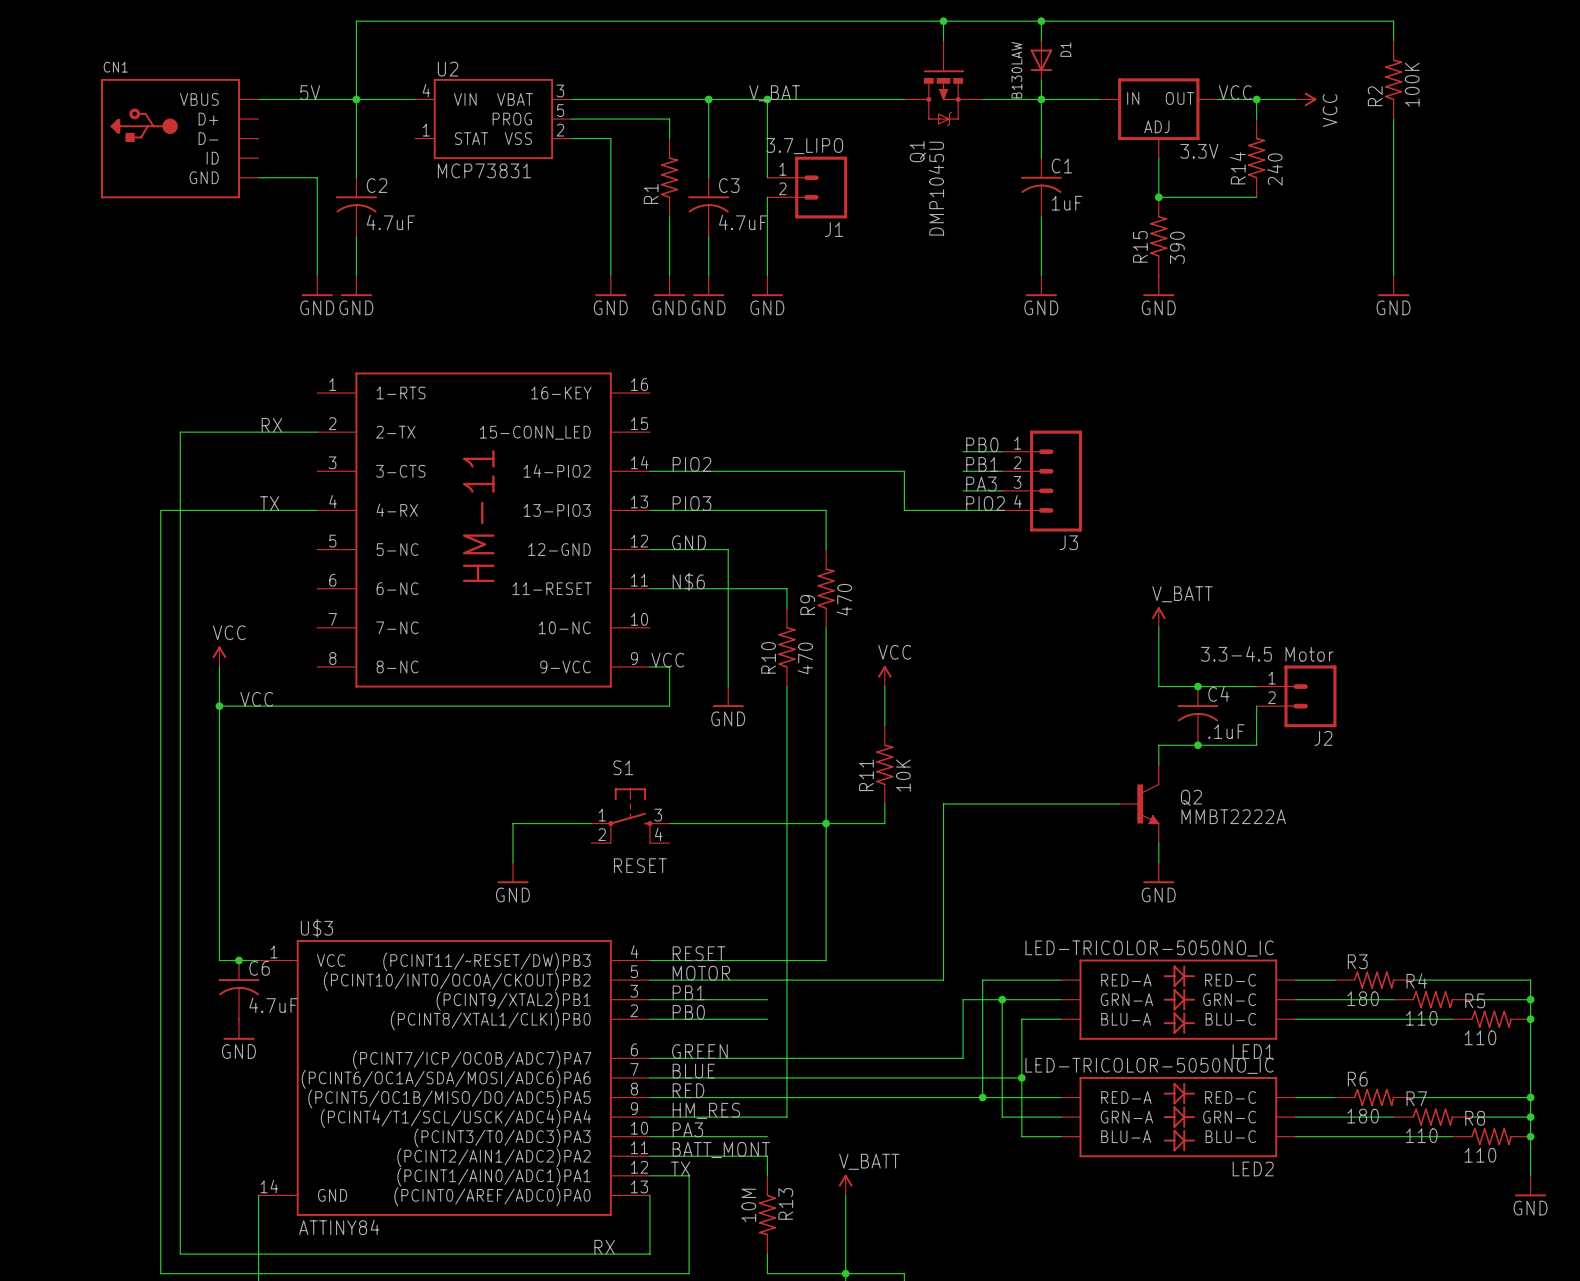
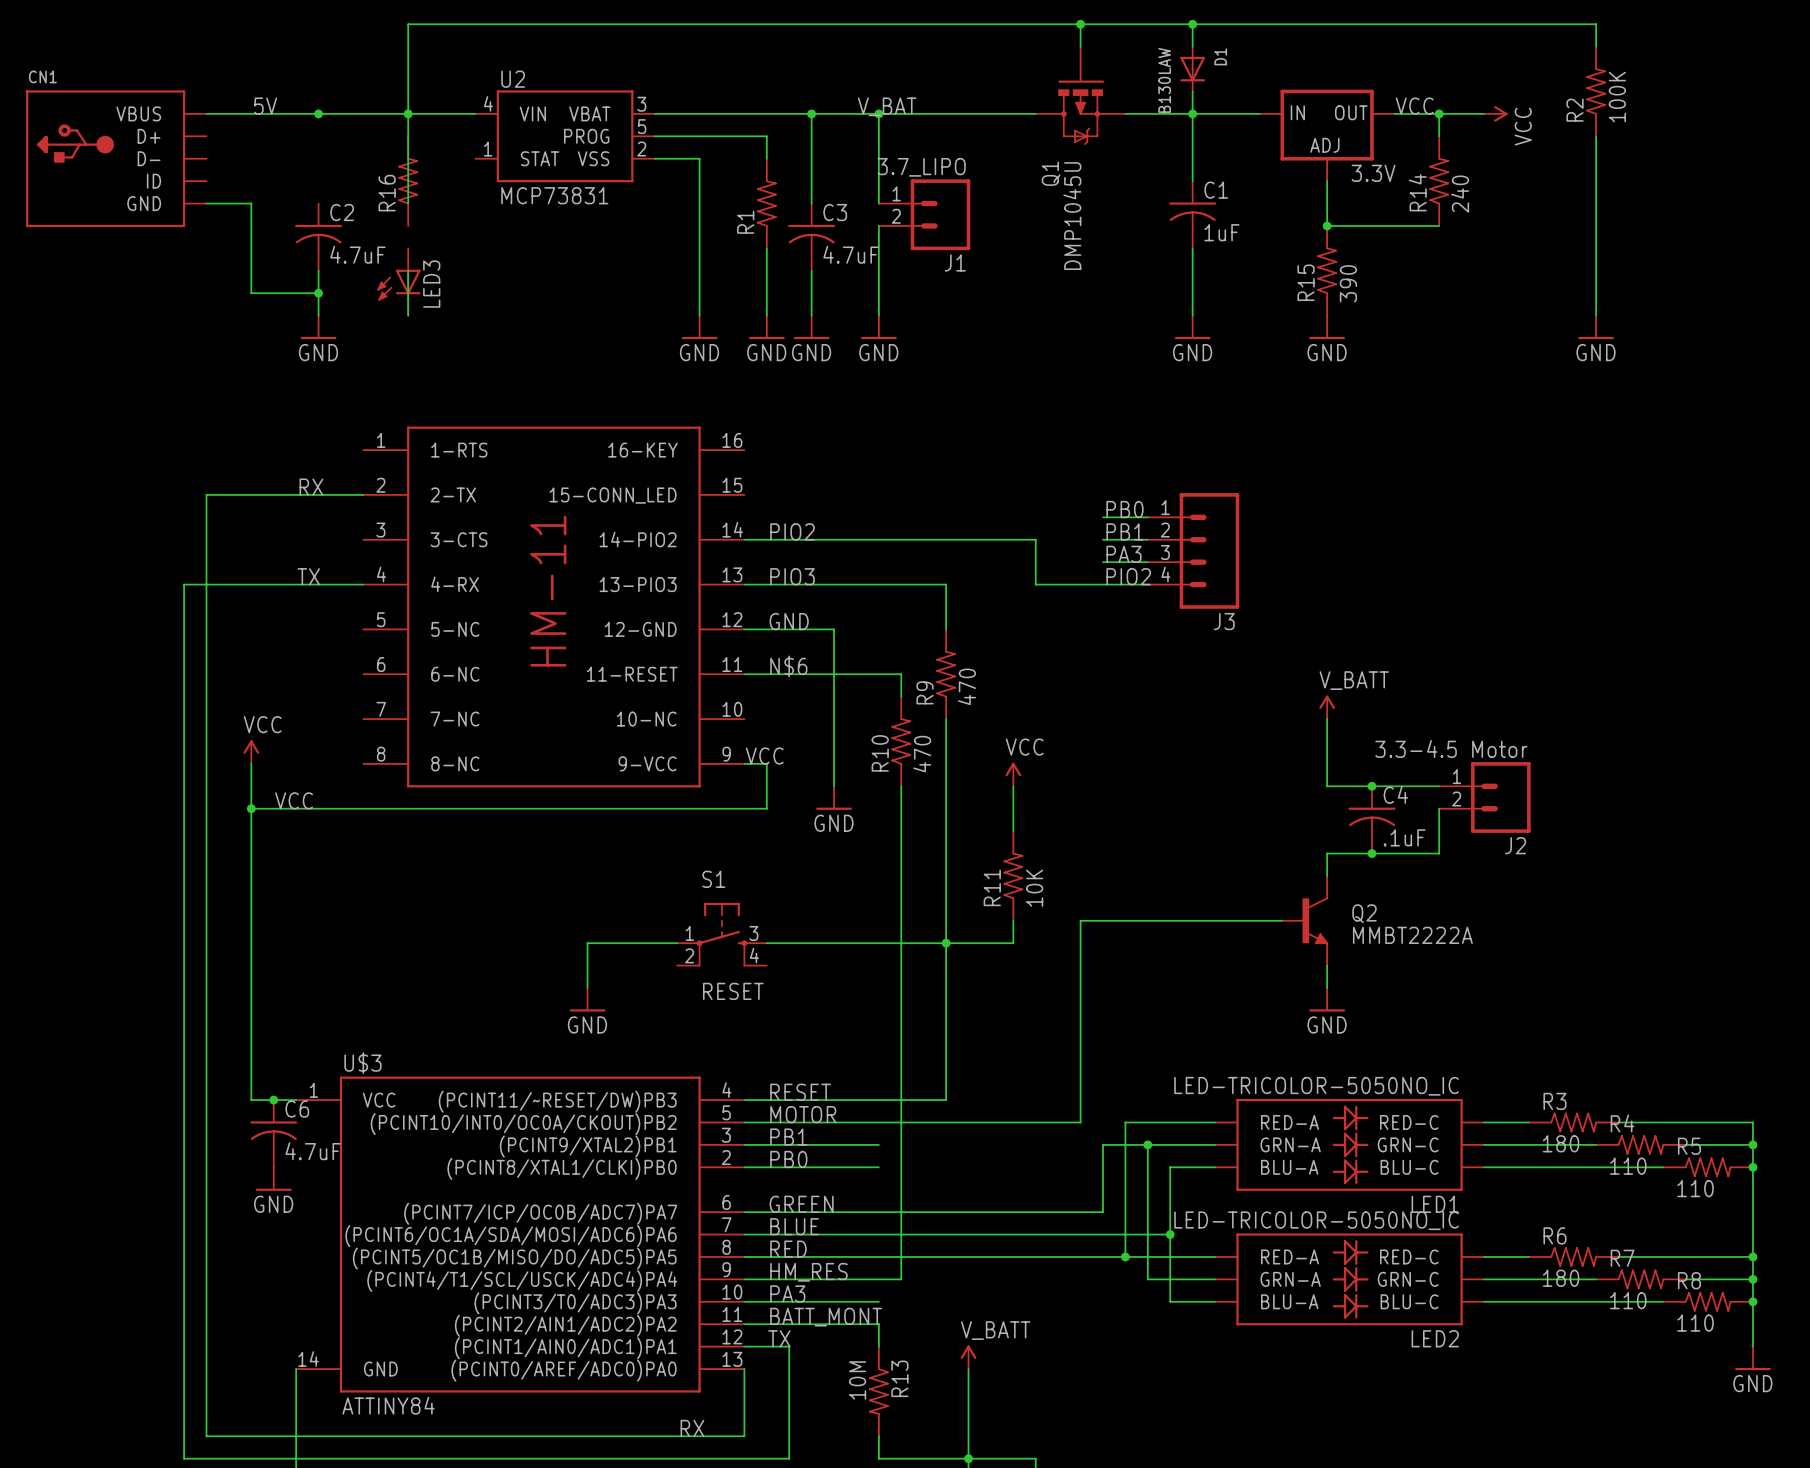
label position: 5V (310, 92) -> 5V (265, 106)
wire: none -> (206, 113) (296, 113)
junction: none -> (318, 113)
CN1 position: (179, 138) -> (116, 158)
R16: none -> (408, 181)
wire: none -> (206, 203) (251, 203) (251, 293) (318, 293)
wire: (258, 177) (317, 177) (317, 275) -> none
C2 position: (356, 207) -> (318, 237)
wire: none -> (318, 270) (318, 315)
LED3: none -> (398, 282)
junction: none -> (318, 293)
power symbol: none -> GND (318, 327)
power symbol: GND (317, 285) -> none
power symbol: GND (356, 285) -> none

